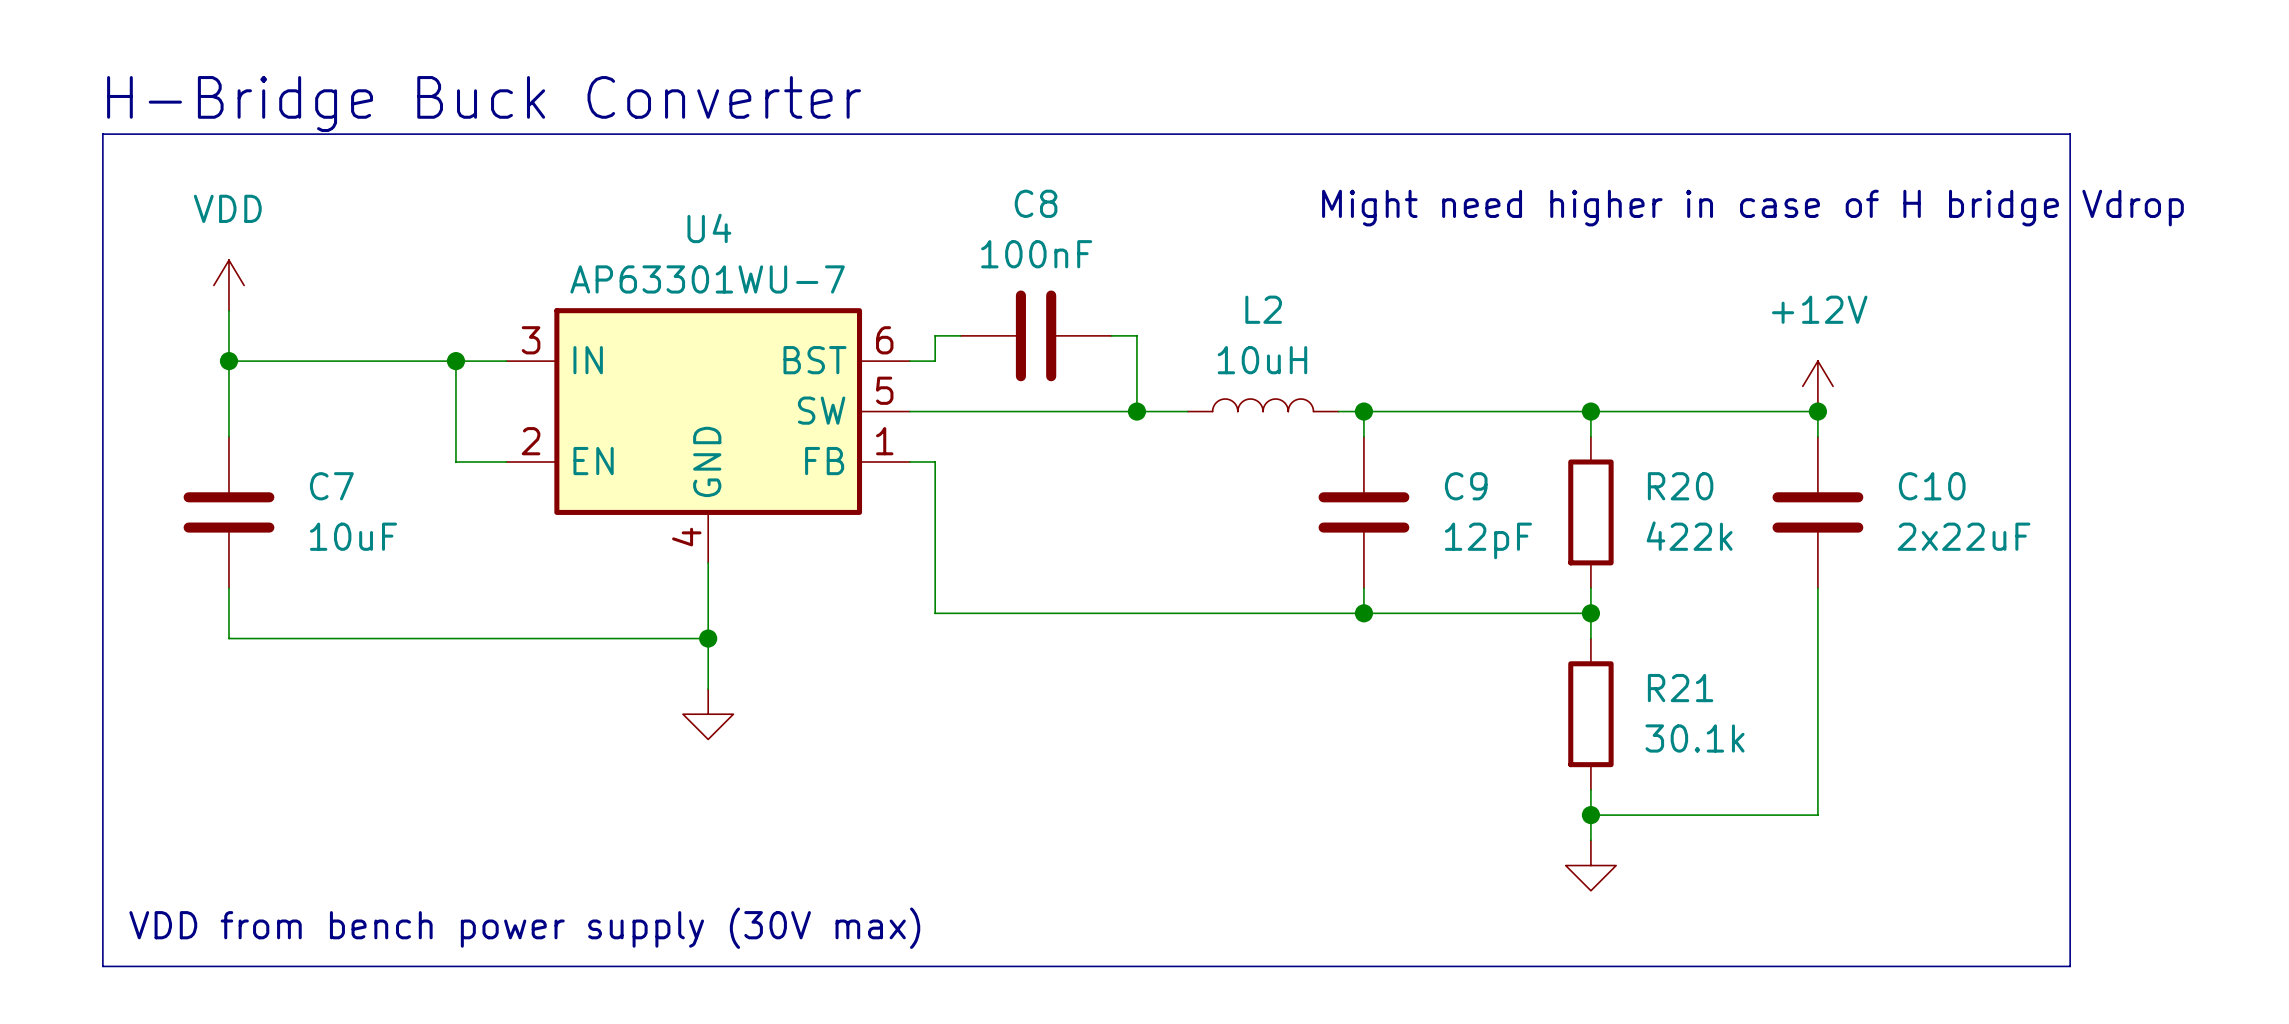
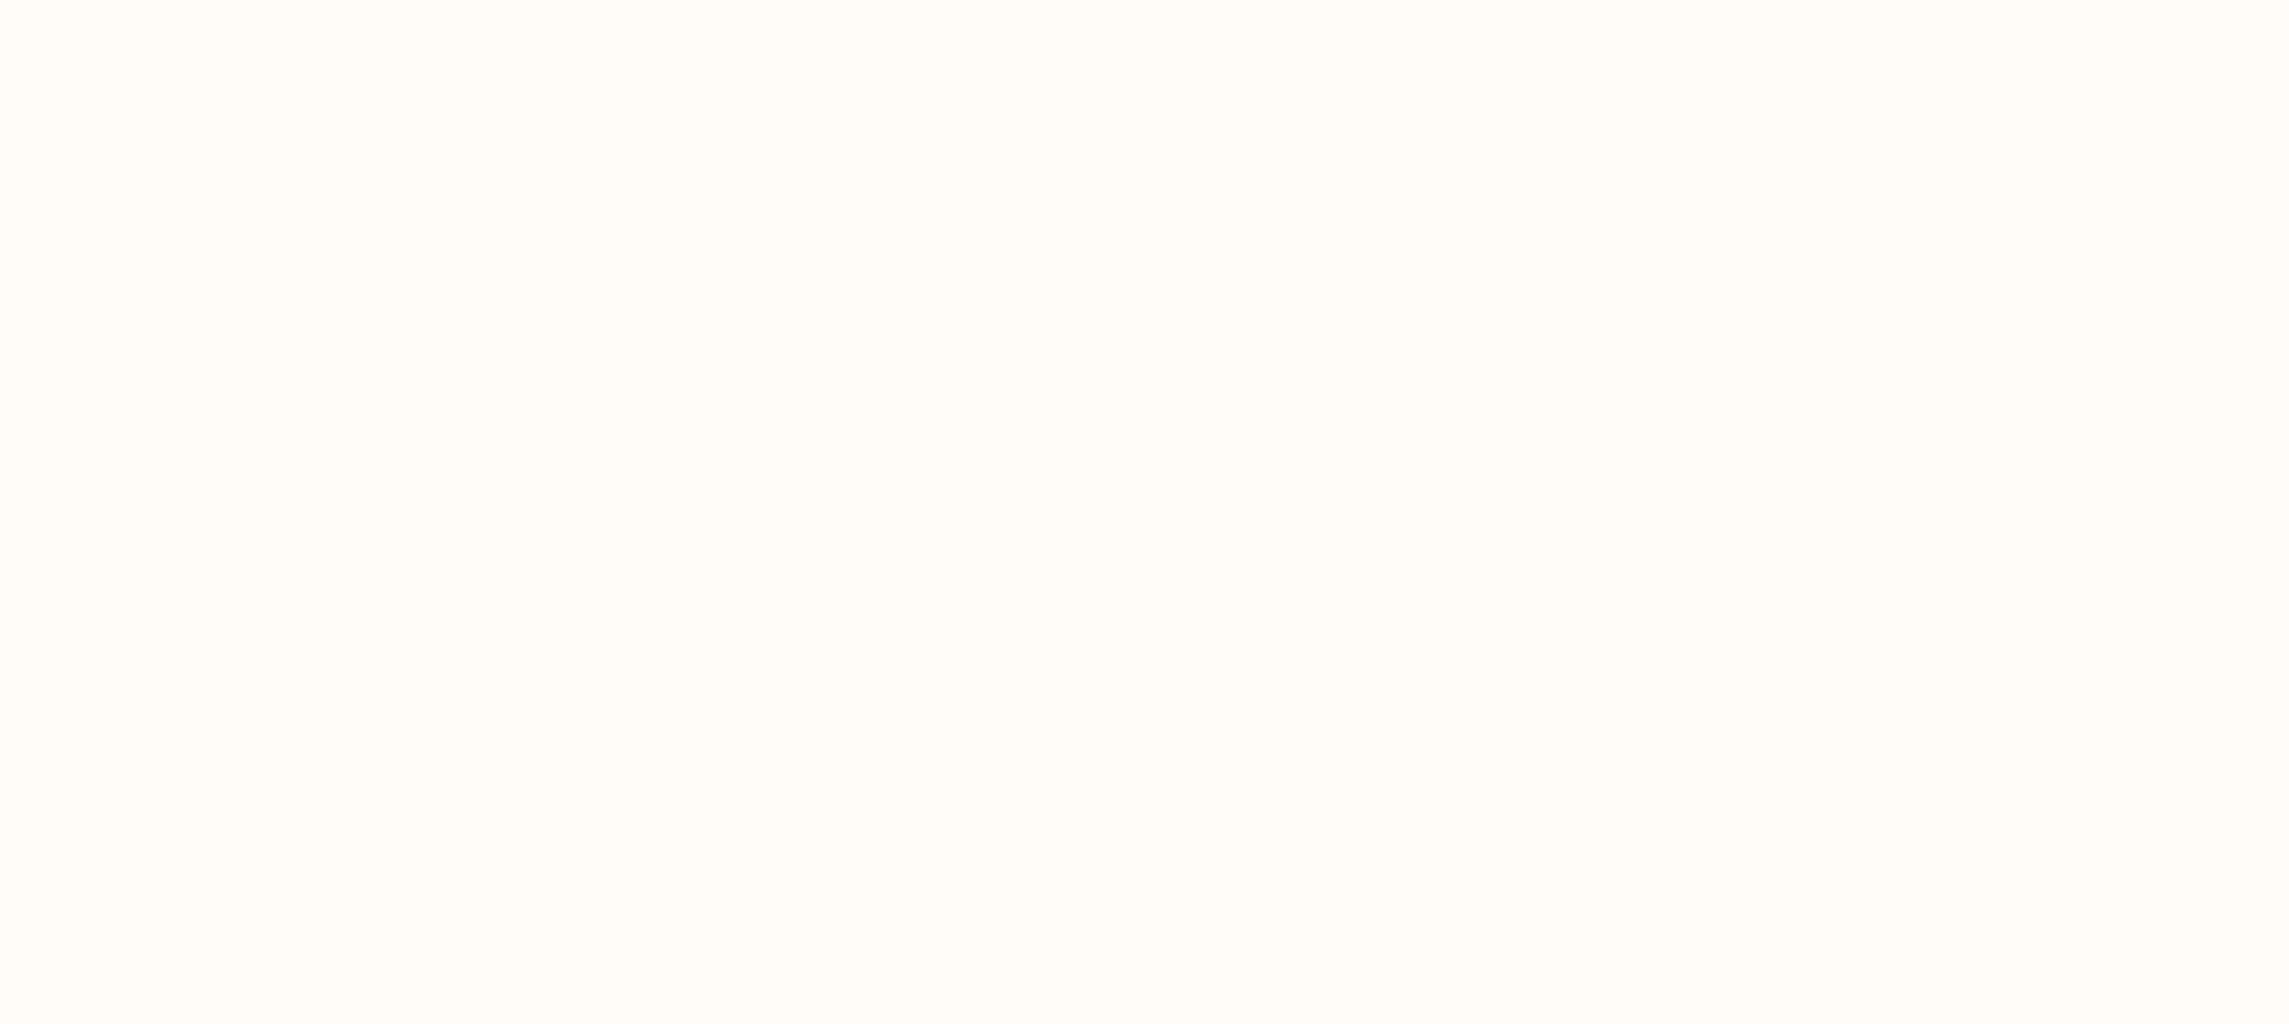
text: H-Bridge Buck Converter (484, 104) -> none
line: (102, 134) (2070, 134) (2070, 966) (102, 966) (102, 134) -> none
text: Might need higher in case of H bridge Vdrop (1752, 208) -> none
power symbol: VDD (228, 285) -> none
wire: (228, 310) (228, 436) -> none
wire: (960, 335) (935, 335) (935, 361) (909, 361) -> none
C8: 100nF (1036, 335) -> none
wire: (1111, 335) (1136, 335) (1136, 411) -> none
wire: (228, 361) (506, 361) -> none
junction: (228, 361) -> none
wire: (455, 361) (455, 462) (506, 462) -> none
junction: (455, 361) -> none
power symbol: +12V (1817, 386) -> none
L2: 10uH (1263, 405) -> none
wire: (909, 411) (1187, 411) -> none
junction: (1136, 411) -> none
wire: (1338, 411) (1817, 411) (1817, 436) -> none
wire: (1363, 411) (1363, 436) -> none
junction: (1363, 411) -> none
wire: (1590, 411) (1590, 436) -> none
junction: (1590, 411) -> none
junction: (1817, 411) -> none
U4: AP63301WU-7 (708, 435) -> none
wire: (909, 462) (935, 462) (935, 613) (1590, 613) -> none
C7: 10uF (228, 512) -> none
C9: 12pF (1363, 512) -> none
R20: 422k (1590, 512) -> none
C10: 2x22uF (1817, 512) -> none
wire: (708, 562) (708, 688) -> none
wire: (228, 588) (228, 638) (708, 638) -> none
wire: (1363, 588) (1363, 613) -> none
wire: (1590, 588) (1590, 638) -> none
wire: (1817, 588) (1817, 815) (1590, 815) -> none
junction: (1363, 613) -> none
junction: (1590, 613) -> none
junction: (708, 638) -> none
power symbol: (708, 714) -> none
R21: 30.1k (1590, 714) -> none
wire: (1590, 789) (1590, 840) -> none
junction: (1590, 815) -> none
power symbol: (1590, 865) -> none
text: VDD from bench power supply (30V max) (524, 928) -> none

